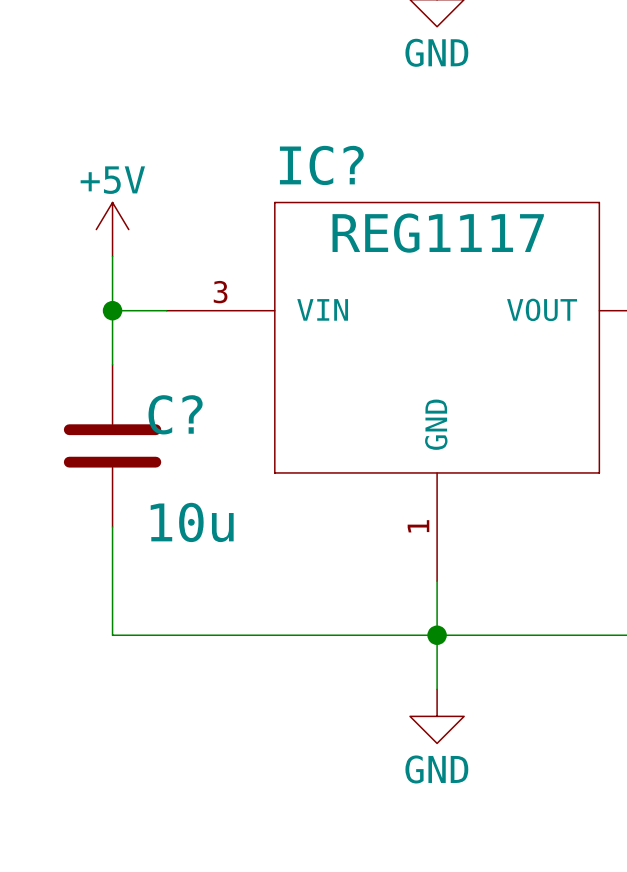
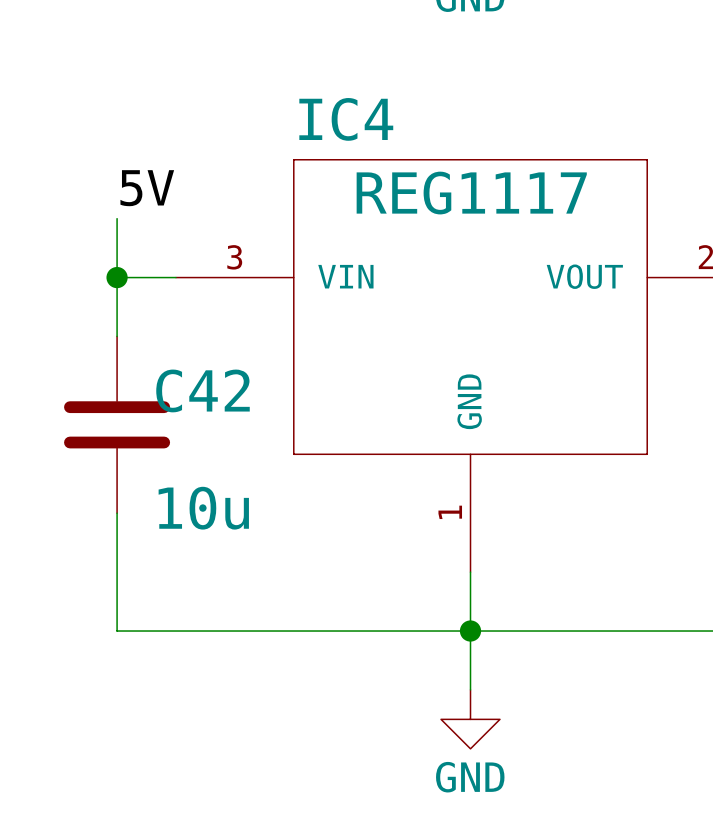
IC? name: IC? (321, 165) -> IC4 (346, 119)
label: none -> 5V (147, 188)
power symbol: +5V (112, 229) -> none
C? name: C? (175, 414) -> C42 (203, 390)

